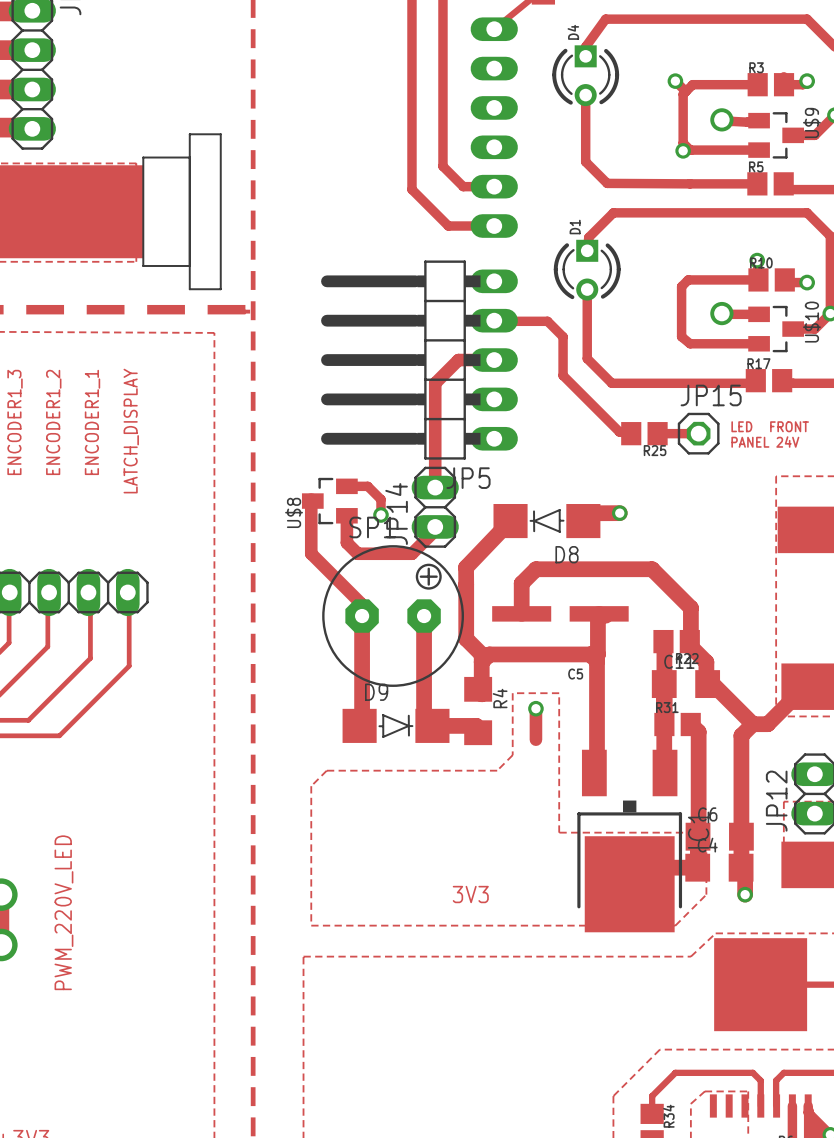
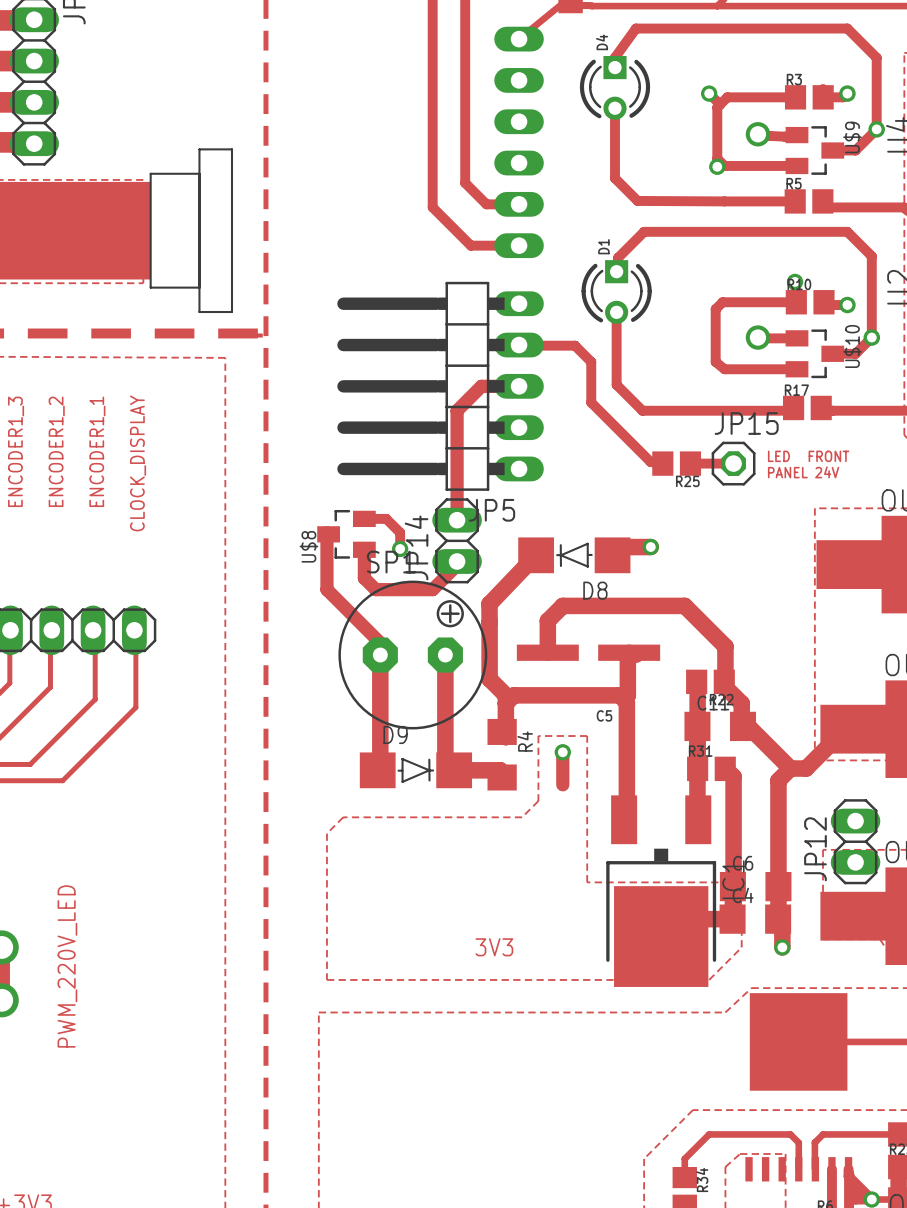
text: LATCH_DISPLAY (131, 431) -> CLOCK_DISPLAY (138, 463)

